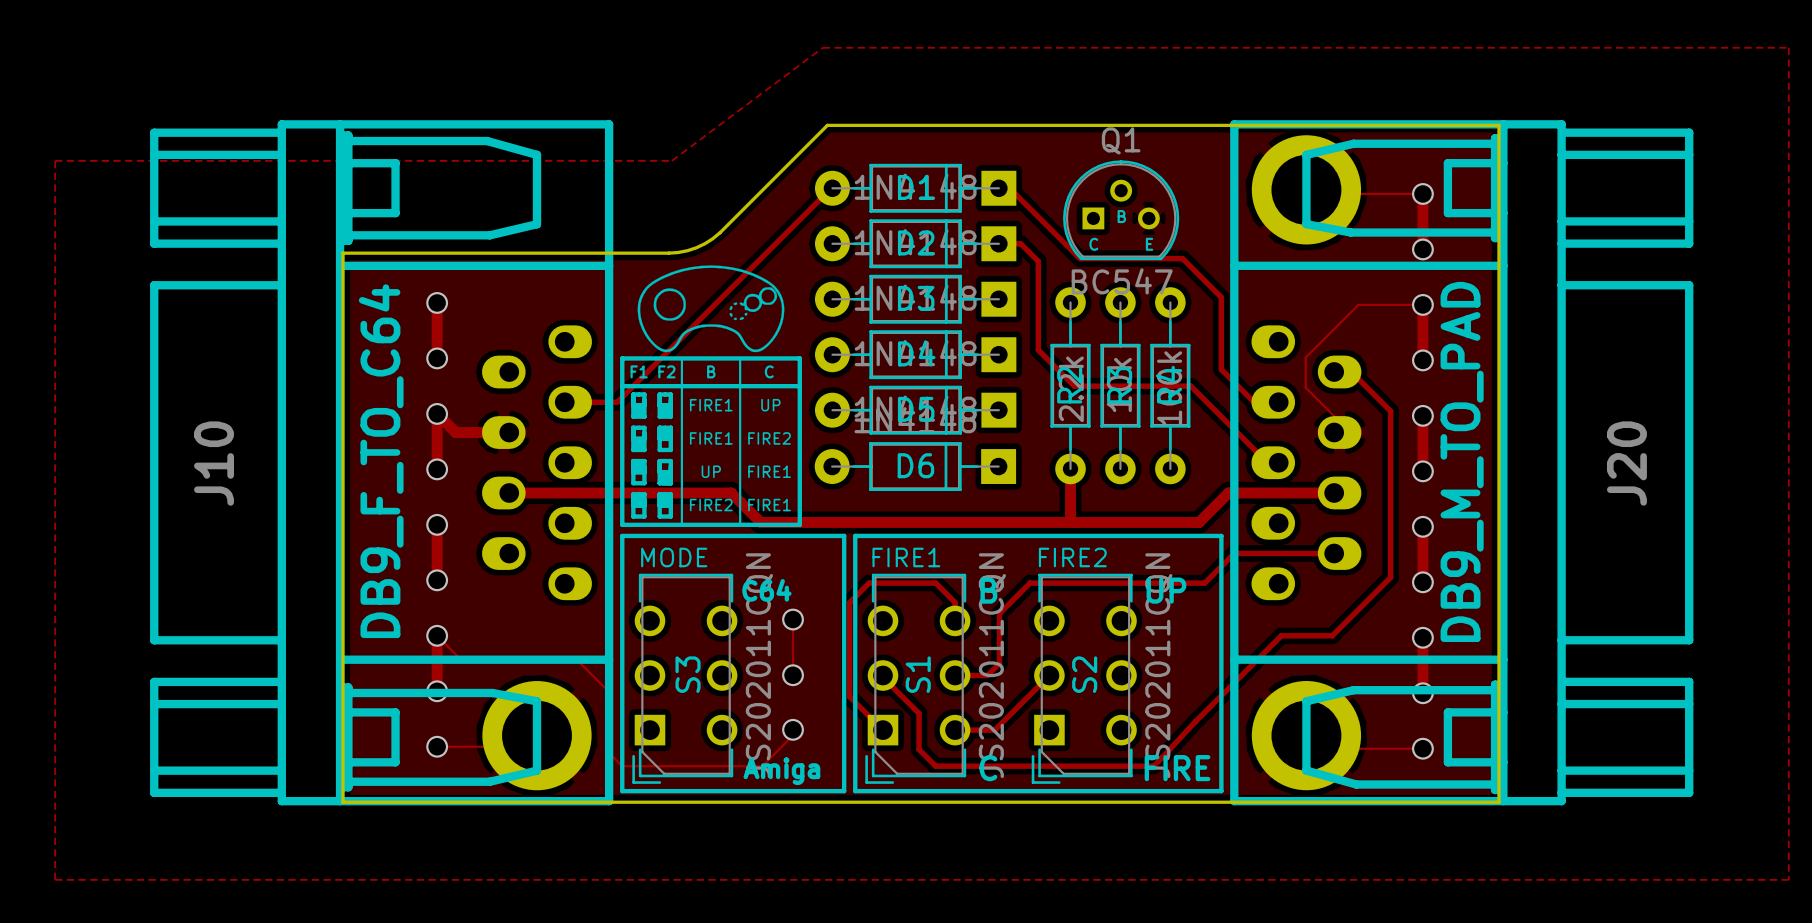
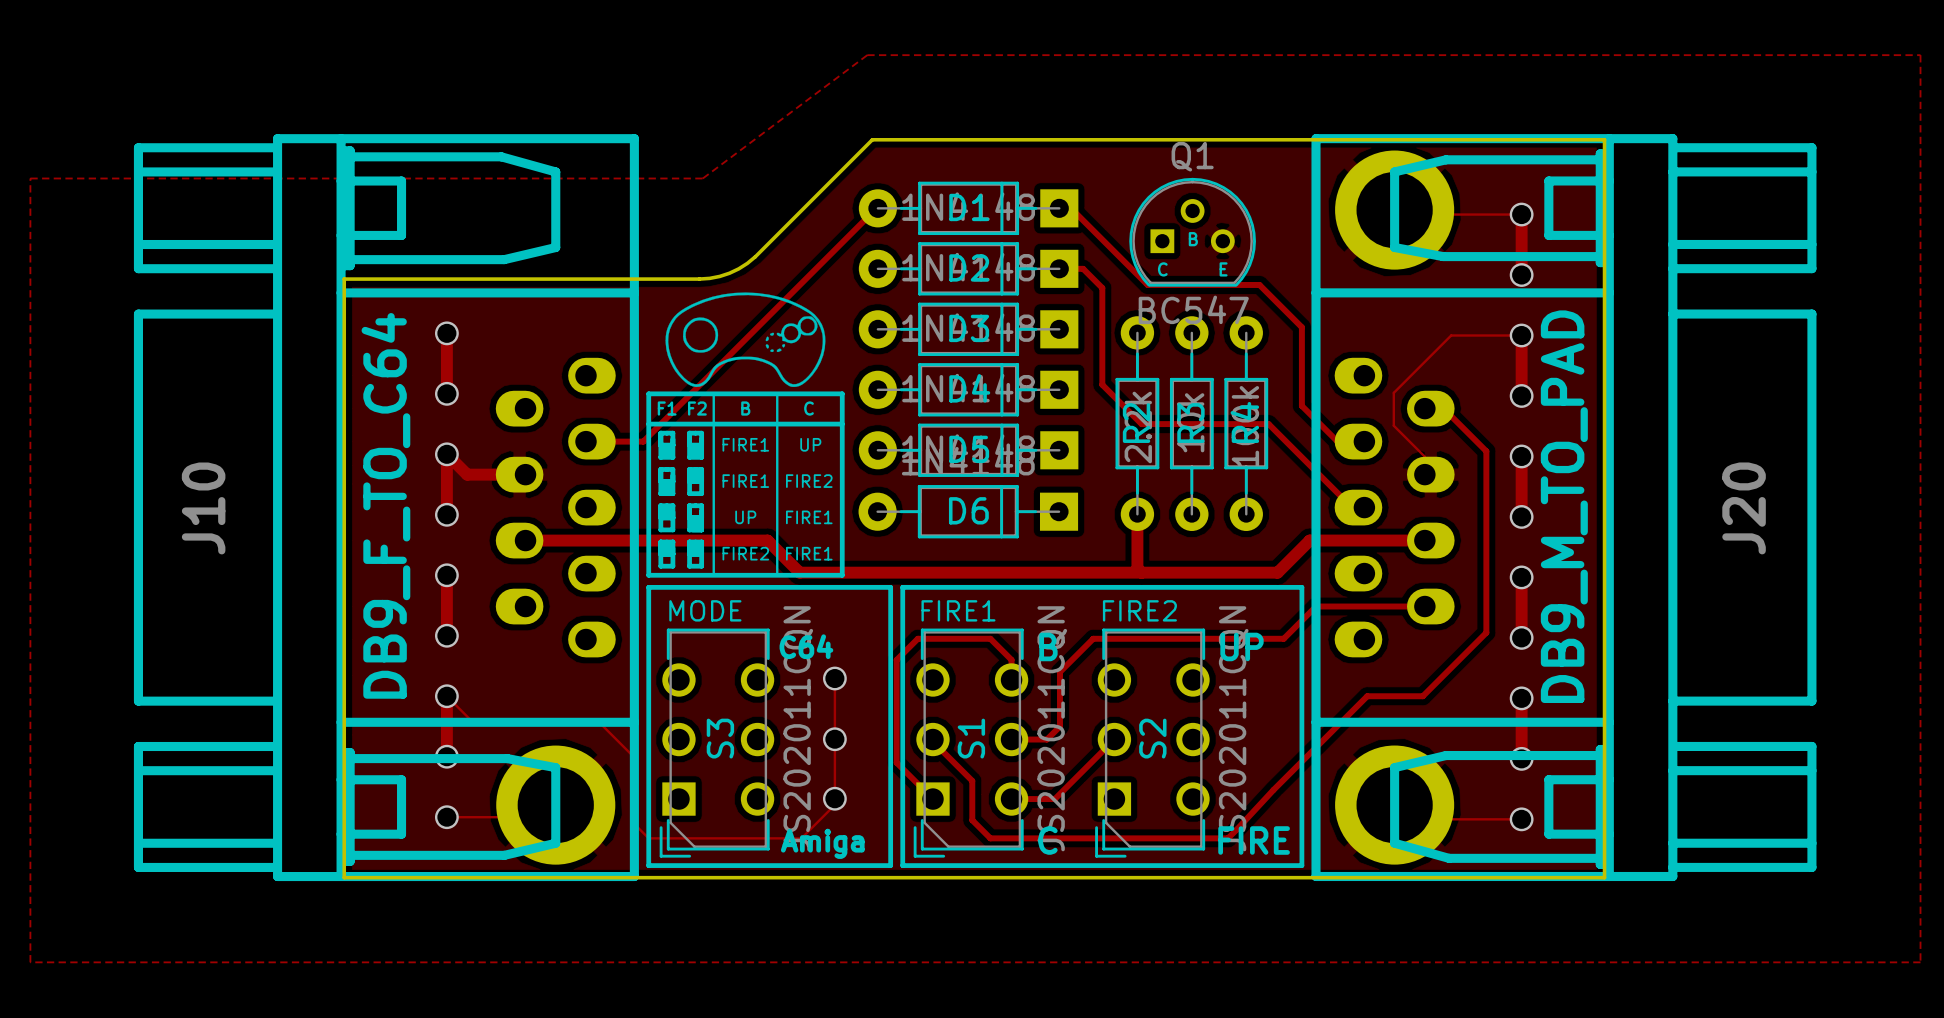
track: none -> (834, 739) (834, 798)

